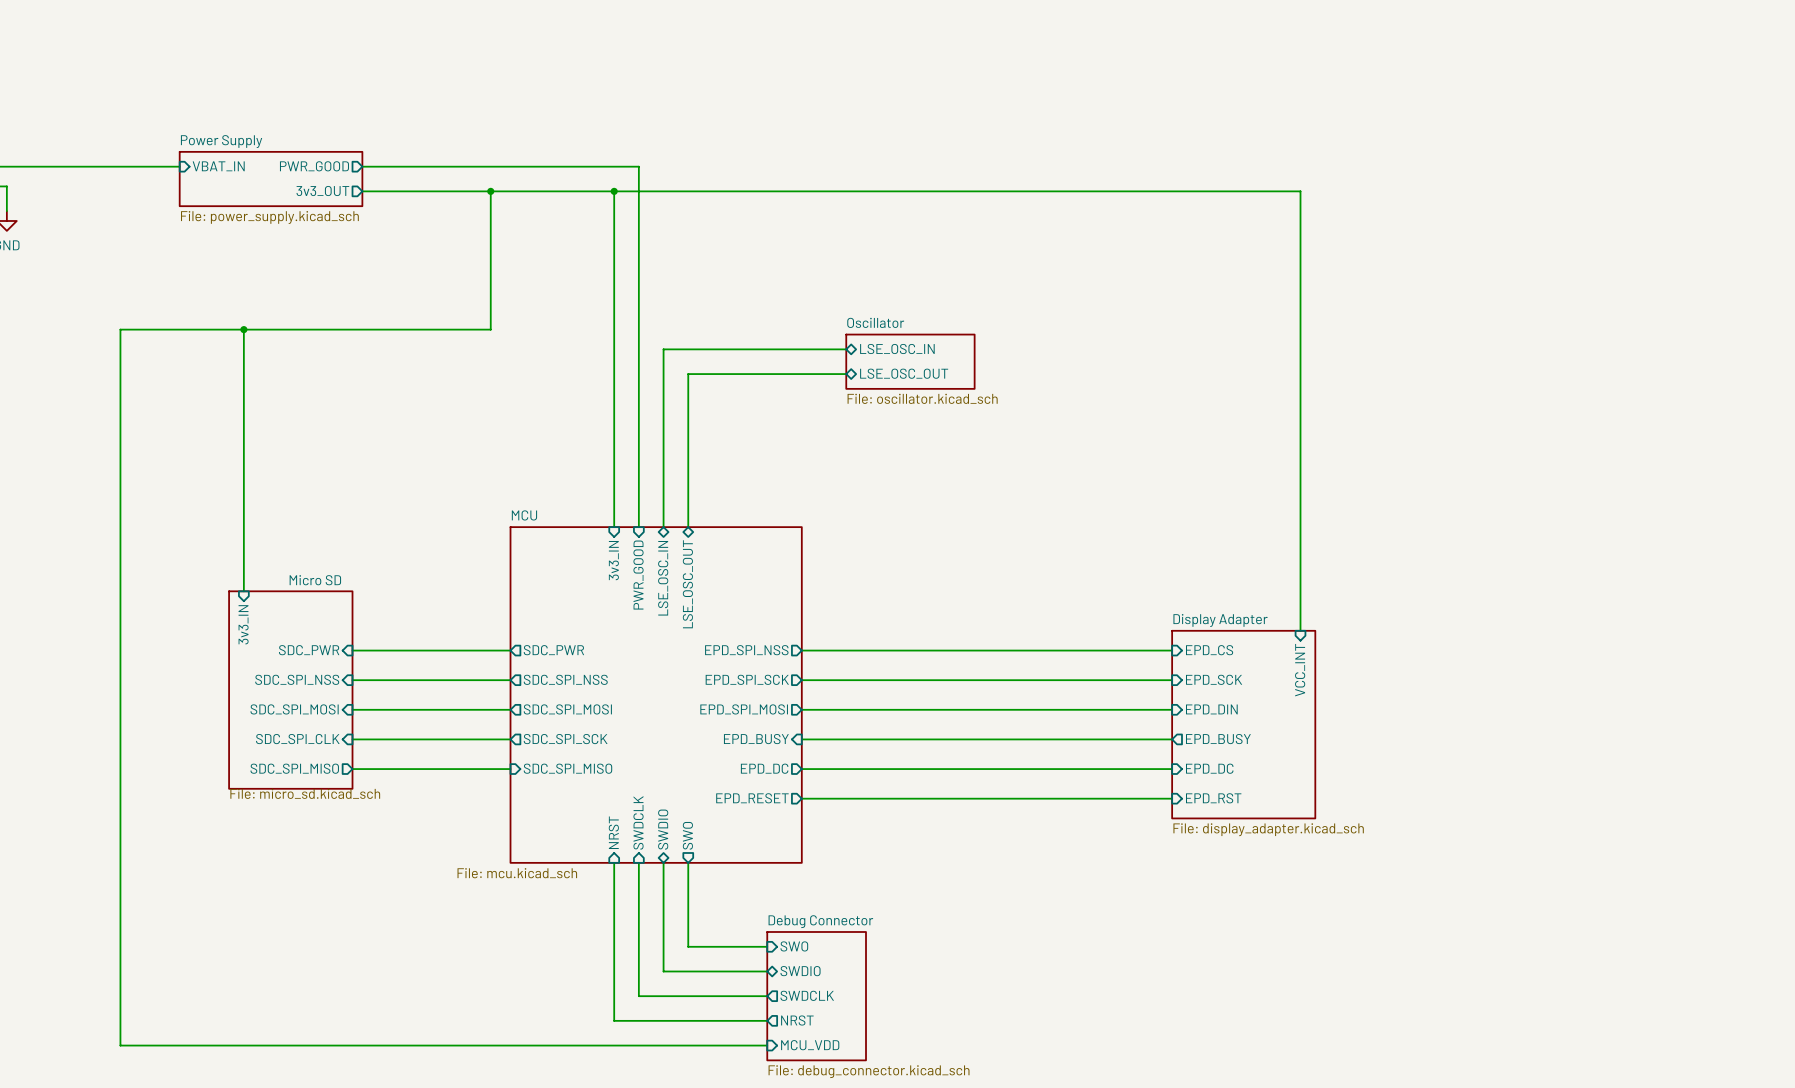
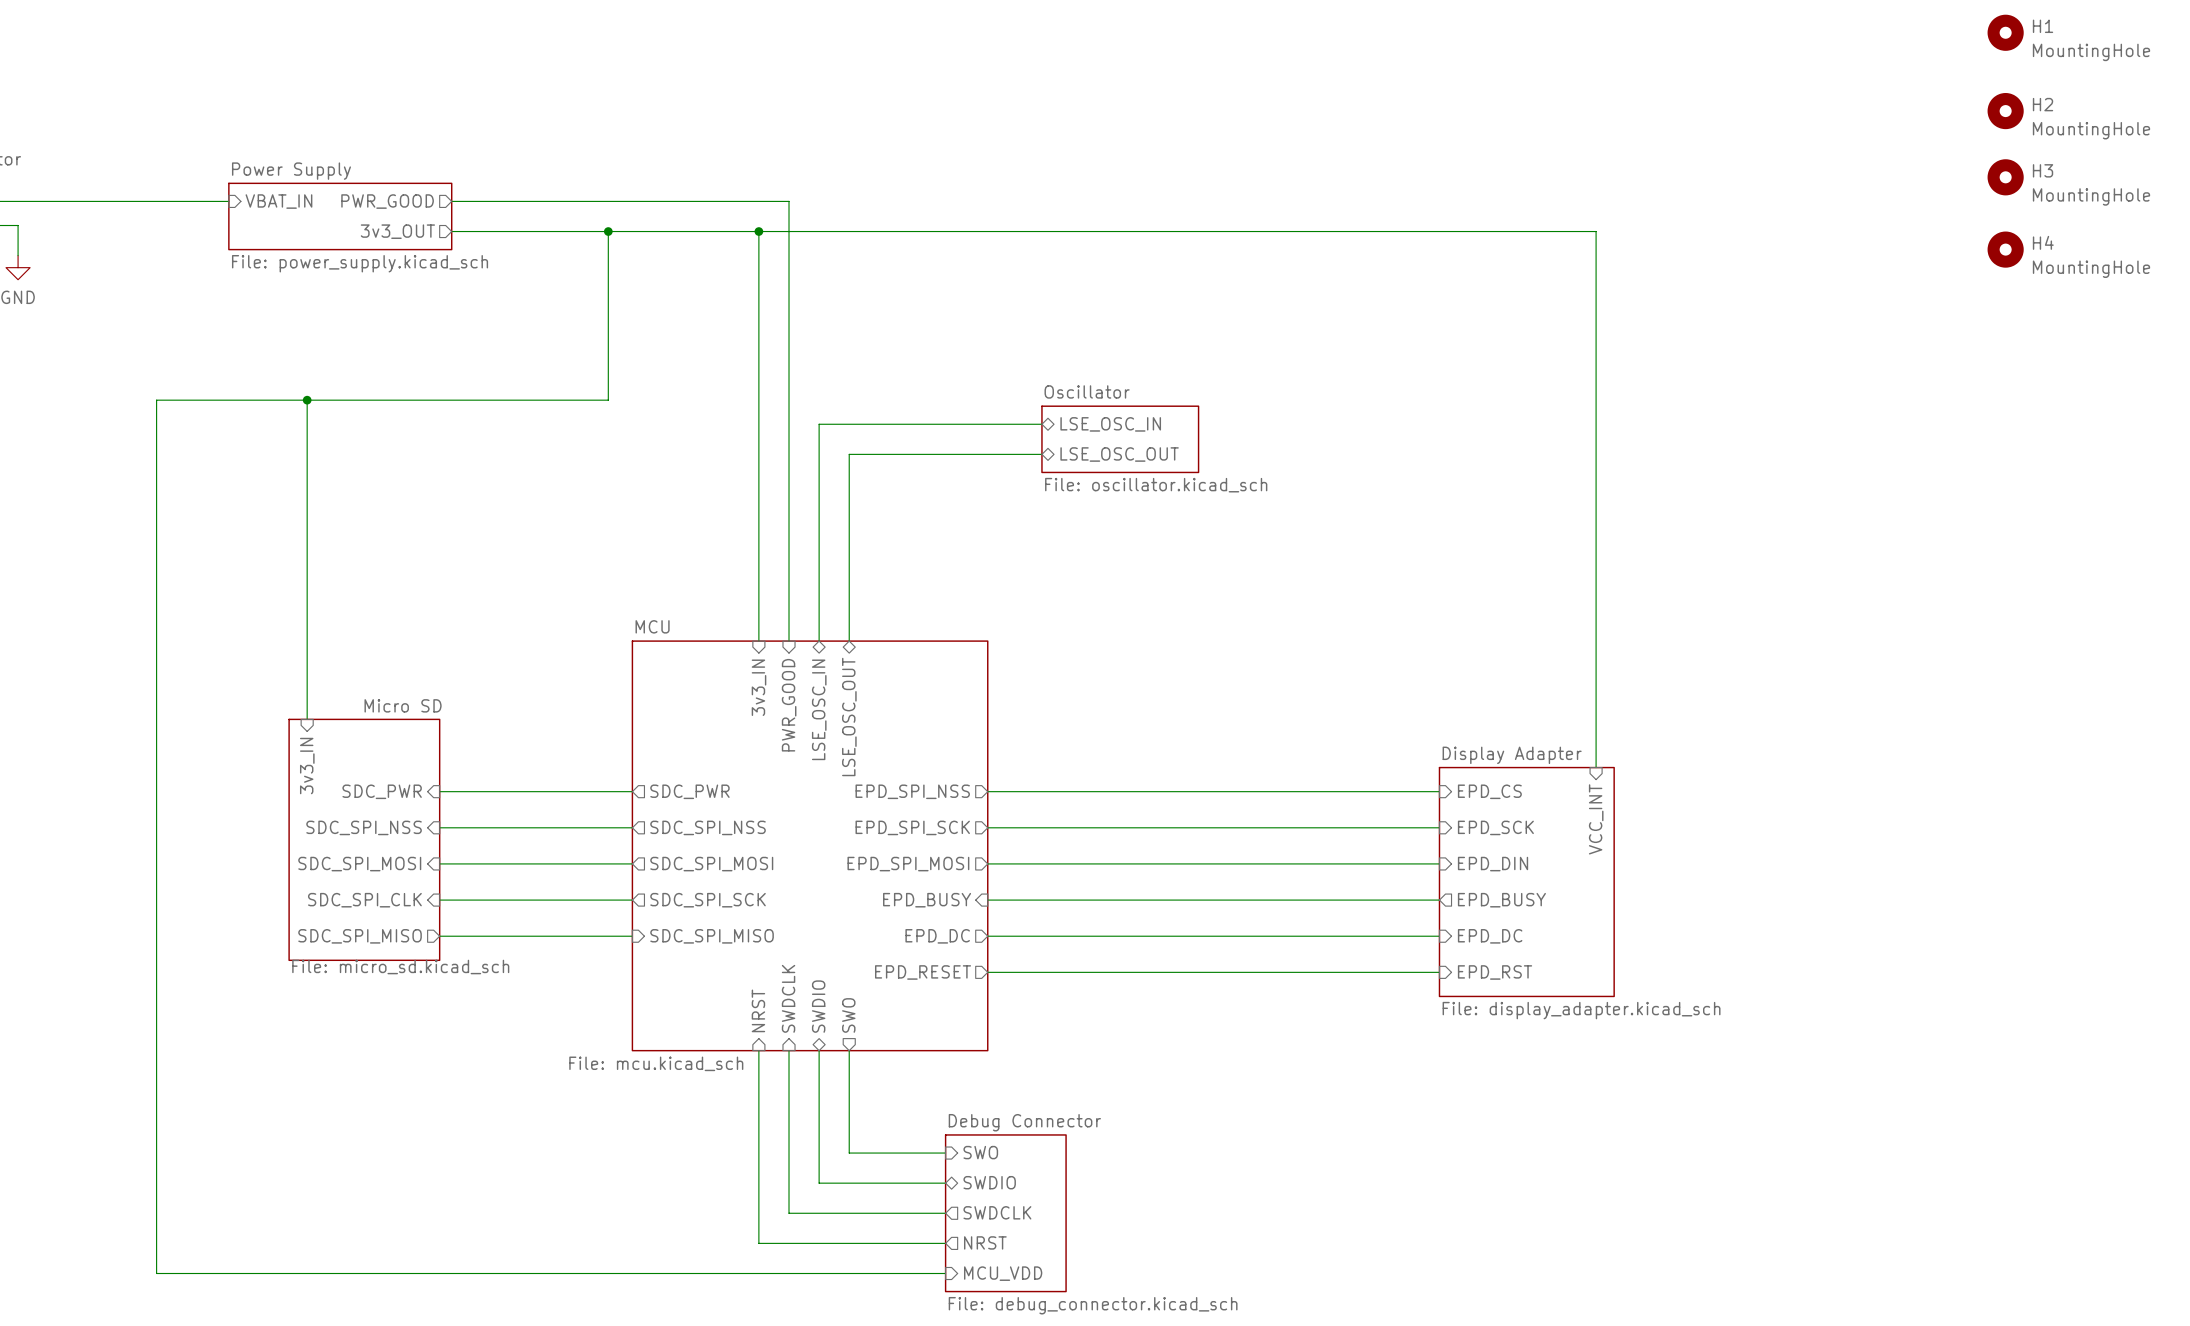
H1: none -> MountingHole (2005, 32)
H2: none -> MountingHole (2005, 111)
H3: none -> MountingHole (2005, 177)
H4: none -> MountingHole (2005, 249)

